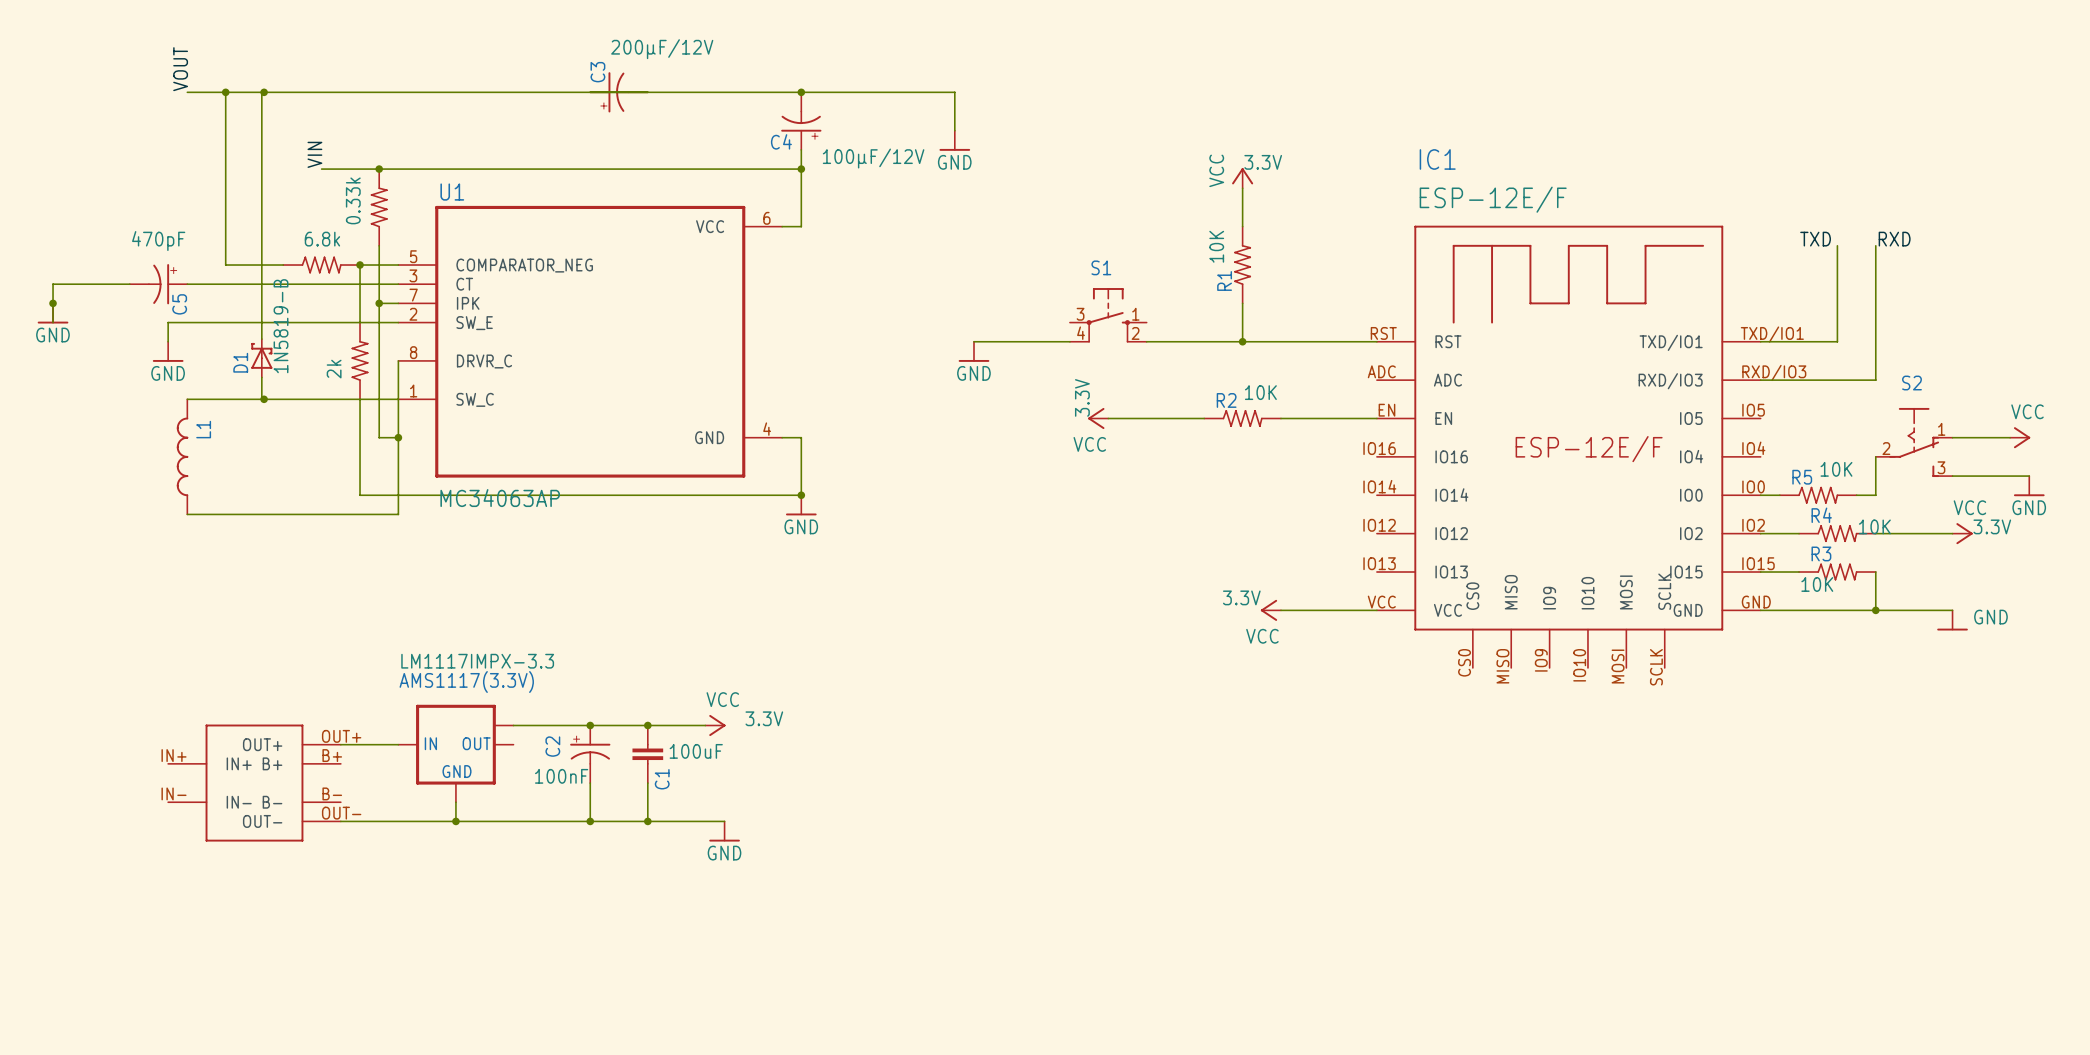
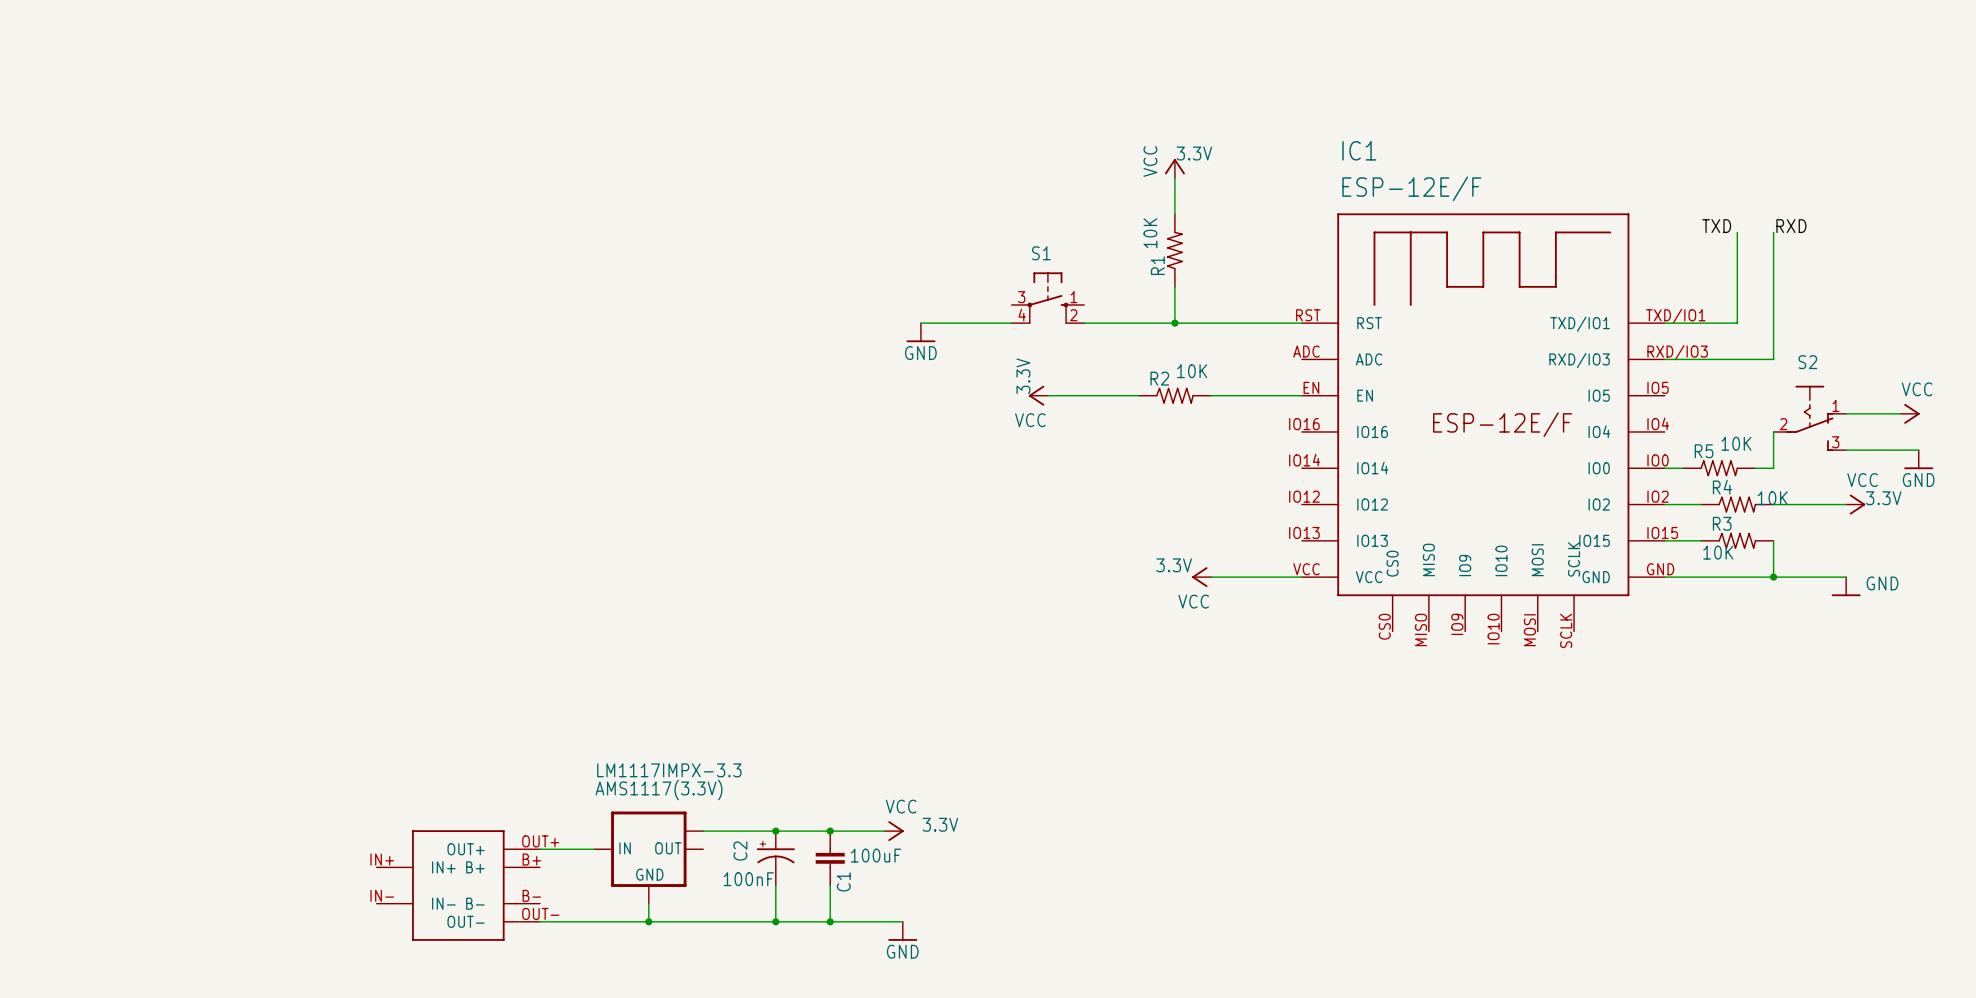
label: VOUT (180, 69) -> none
wire: (187, 92) (954, 92) (954, 130) -> none
wire: (225, 92) (225, 265) (283, 265) -> none
junction: (225, 92) -> none
wire: (264, 92) (261, 94) (261, 339) -> none
junction: (264, 92) -> none
C3: (619, 92) -> none
junction: (801, 92) -> none
C4: (801, 121) -> none
power symbol: GND (954, 140) -> none
wire: (801, 149) (801, 226) (782, 226) -> none
label: VIN (314, 154) -> none
wire: (321, 169) (801, 169) -> none
junction: (379, 169) -> none
junction: (801, 169) -> none
part: (379, 207) -> none
wire: (379, 245) (379, 437) (398, 437) -> none
part: (321, 265) -> none
junction: (360, 265) -> none
wire: (398, 265) (360, 265) (360, 322) -> none
wire: (129, 284) (53, 284) (53, 322) -> none
C5: (158, 284) -> none
wire: (187, 284) (398, 284) -> none
junction: (53, 303) -> none
wire: (379, 303) (398, 303) -> none
junction: (379, 303) -> none
power symbol: GND (53, 313) -> none
wire: (398, 322) (168, 322) (168, 341) -> none
U1: MC34063AP (590, 341) -> none
power symbol: GND (168, 351) -> none
D1: 1N5819-B (261, 358) -> none
part: (360, 360) -> none
wire: (398, 360) (398, 514) (187, 514) -> none
wire: (261, 377) (261, 397) (264, 399) -> none
wire: (187, 399) (398, 399) -> none
junction: (264, 399) -> none
wire: (360, 399) (360, 495) (801, 495) (801, 437) (782, 437) -> none
junction: (398, 437) -> none
L1: (182, 456) -> none
junction: (801, 495) -> none
power symbol: GND (801, 505) -> none
wire: (513, 725) (705, 725) -> none
junction: (590, 725) -> none
junction: (647, 725) -> none
power symbol: VCC (715, 725) -> none
wire: (340, 744) (398, 744) -> none
AMS1117(3.3V) position: (455, 753) -> (648, 857)
C2 position: (590, 754) -> (775, 858)
C1 position: (647, 754) -> (830, 858)
part: (254, 783) -> none
wire: (590, 783) (590, 821) -> none
wire: (647, 783) (647, 821) -> none
wire: (455, 802) (455, 821) -> none
wire: (340, 821) (724, 821) -> none
junction: (455, 821) -> none
junction: (590, 821) -> none
junction: (647, 821) -> none
power symbol: GND (724, 831) -> none
wire: none -> (703, 831) (884, 831)
junction: none -> (775, 831)
junction: none -> (830, 831)
power symbol: none -> VCC (894, 831)
wire: none -> (539, 849) (594, 849)
part: none -> (458, 885)
wire: none -> (775, 885) (775, 921)
wire: none -> (830, 885) (830, 921)
wire: none -> (648, 903) (648, 921)
wire: none -> (539, 921) (902, 921)
junction: none -> (648, 921)
junction: none -> (775, 921)
junction: none -> (830, 921)
power symbol: none -> GND (902, 931)

